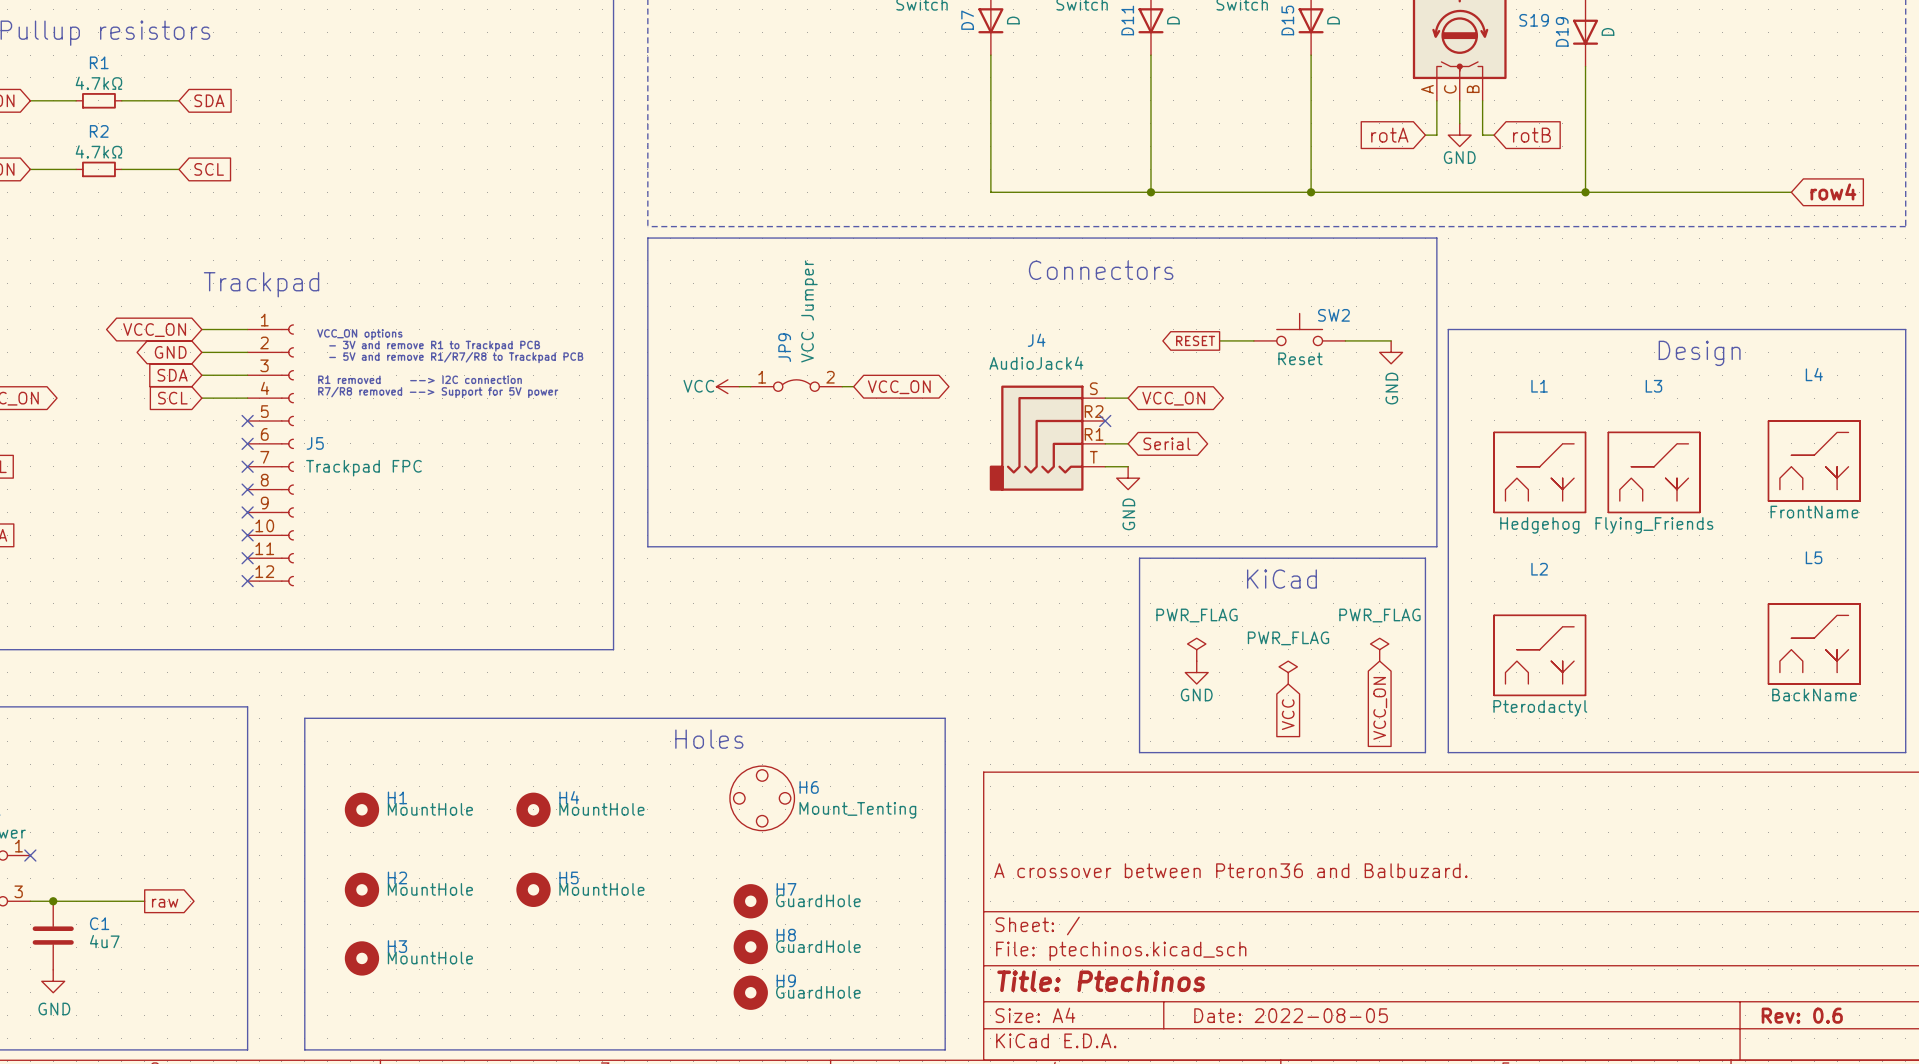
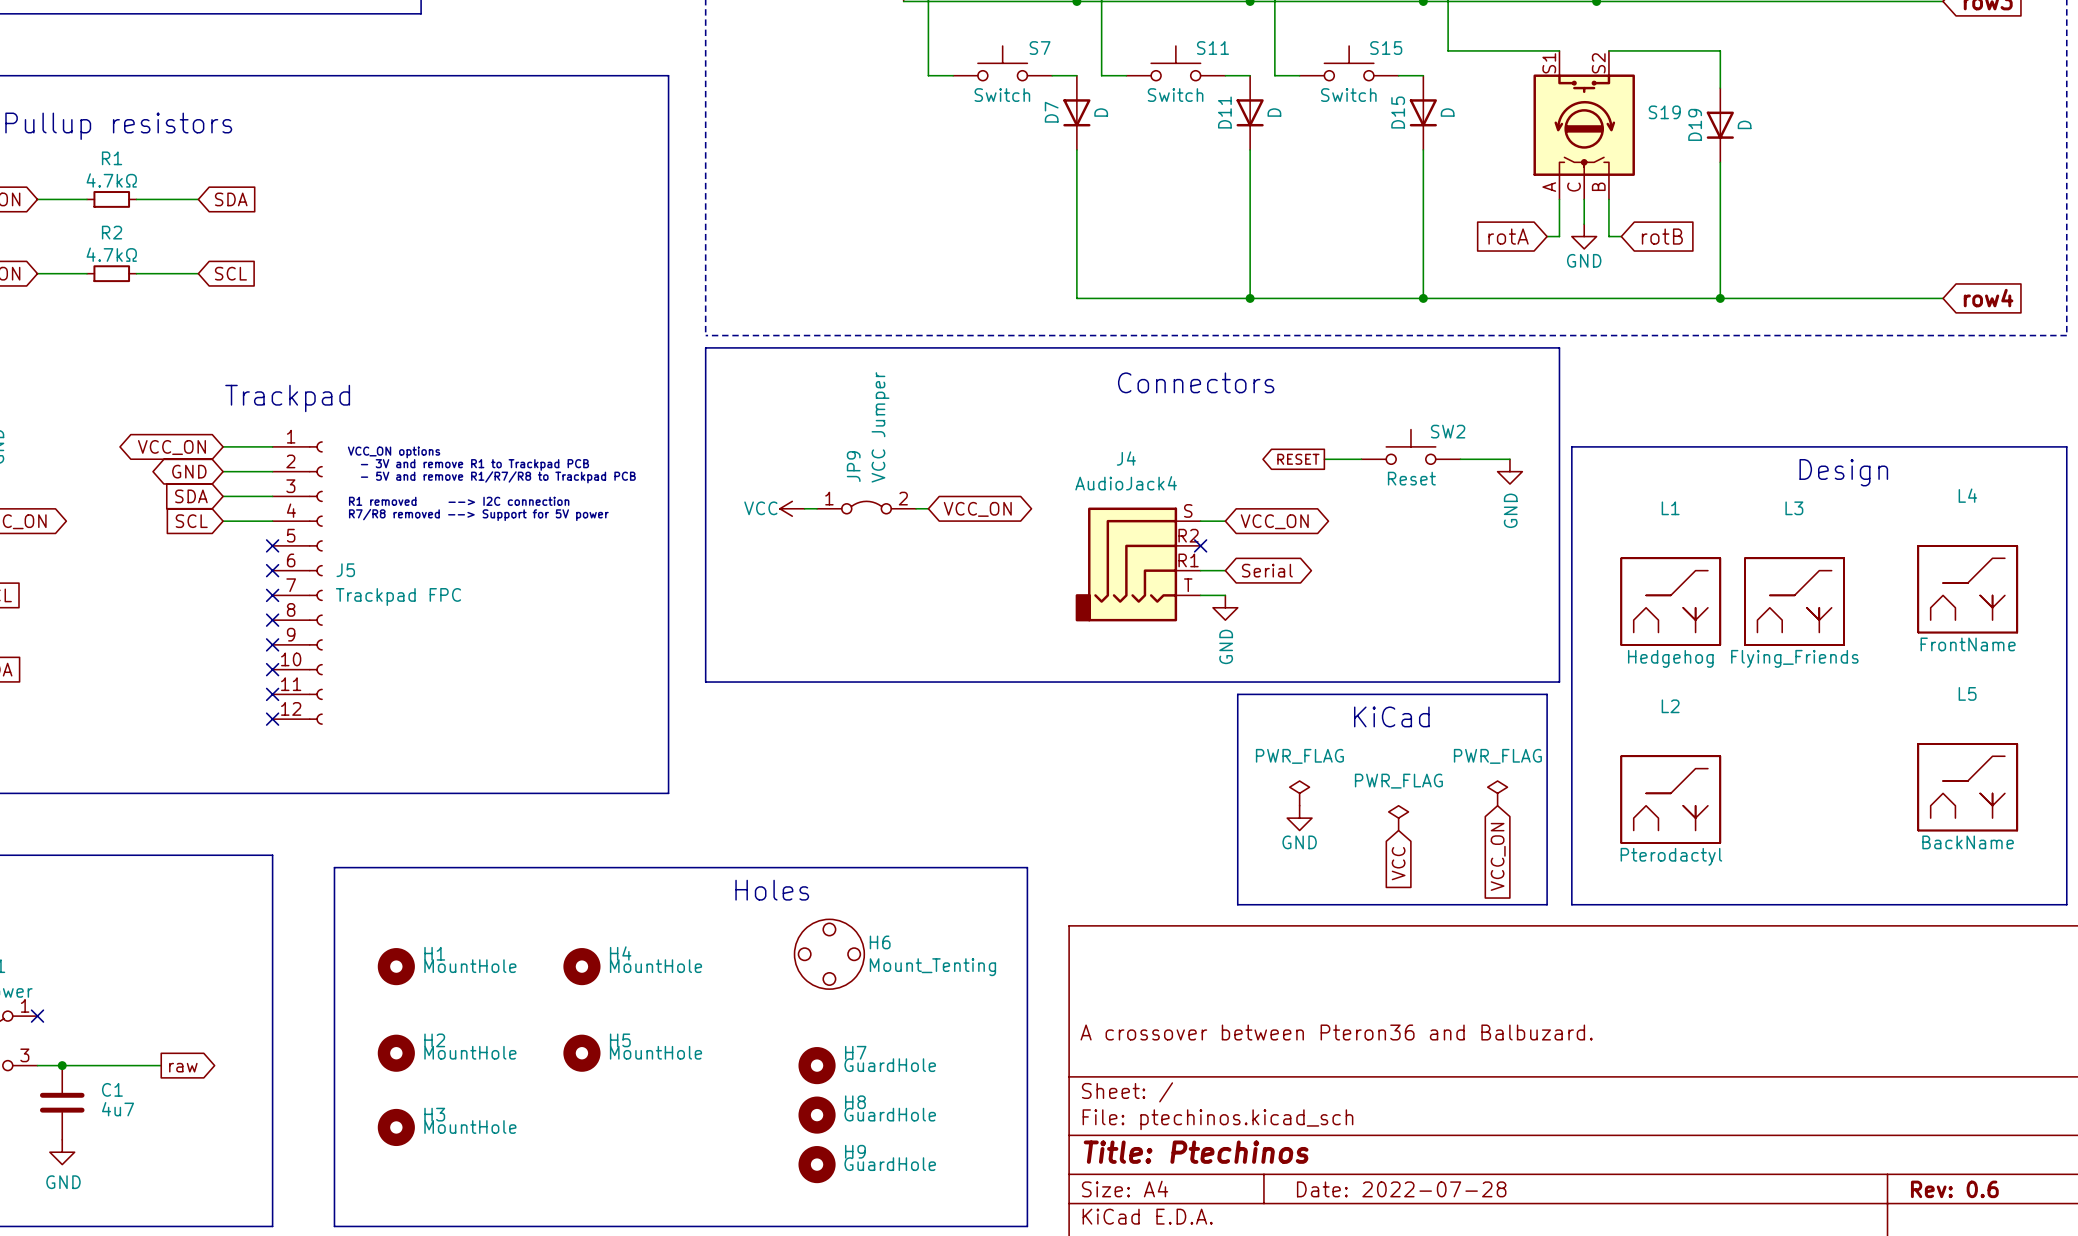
title block: Date: 2022-08-05 (1291, 1015) -> Date: 2022-07-28 (1401, 1189)

